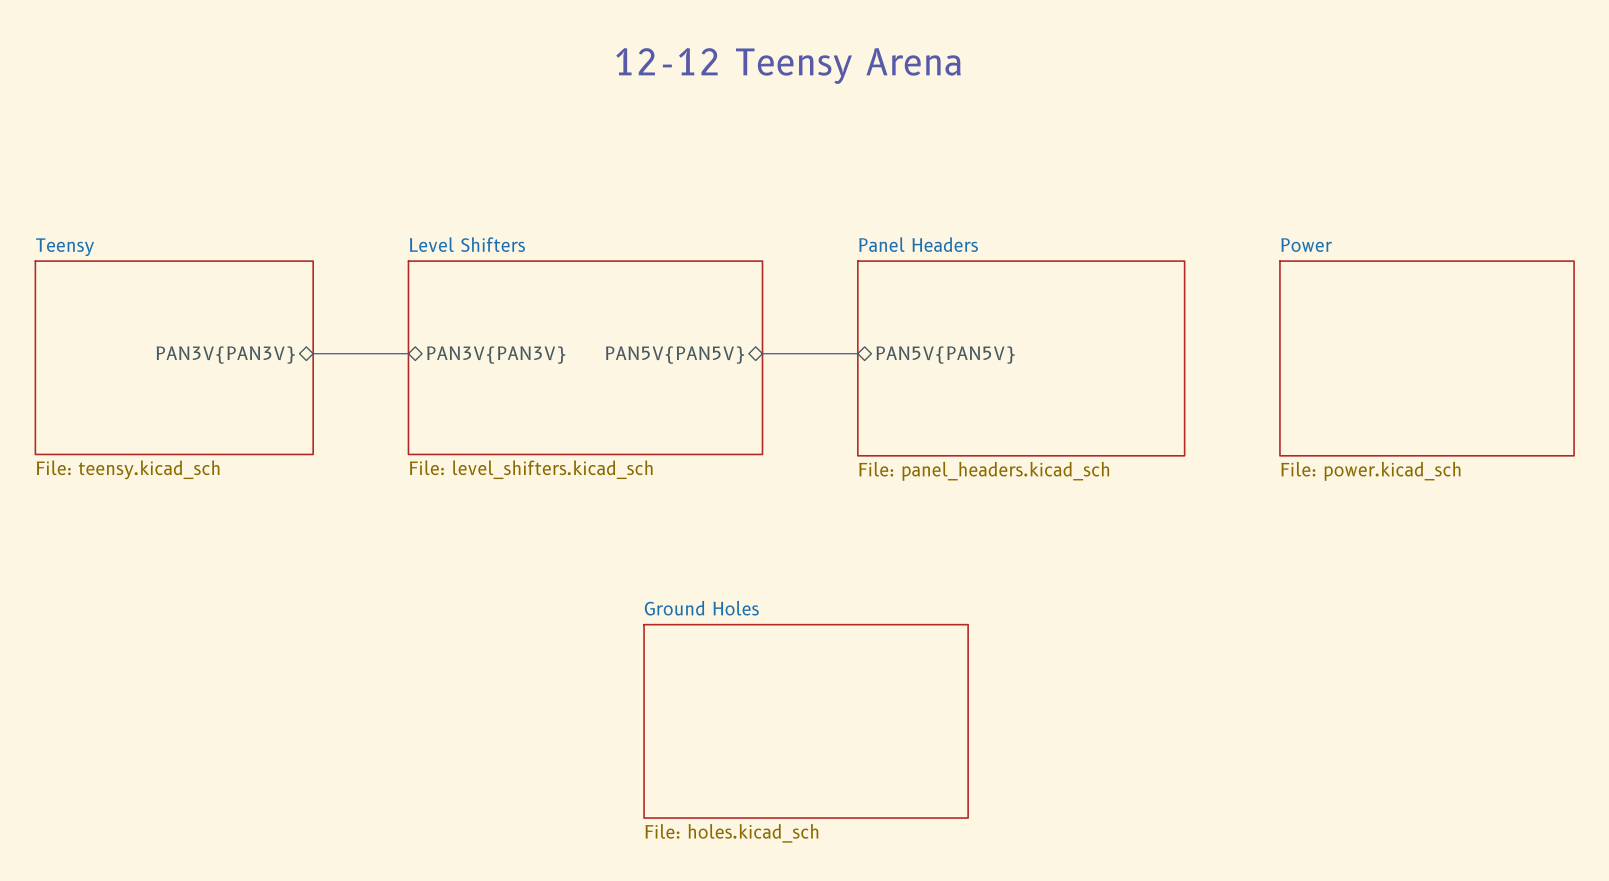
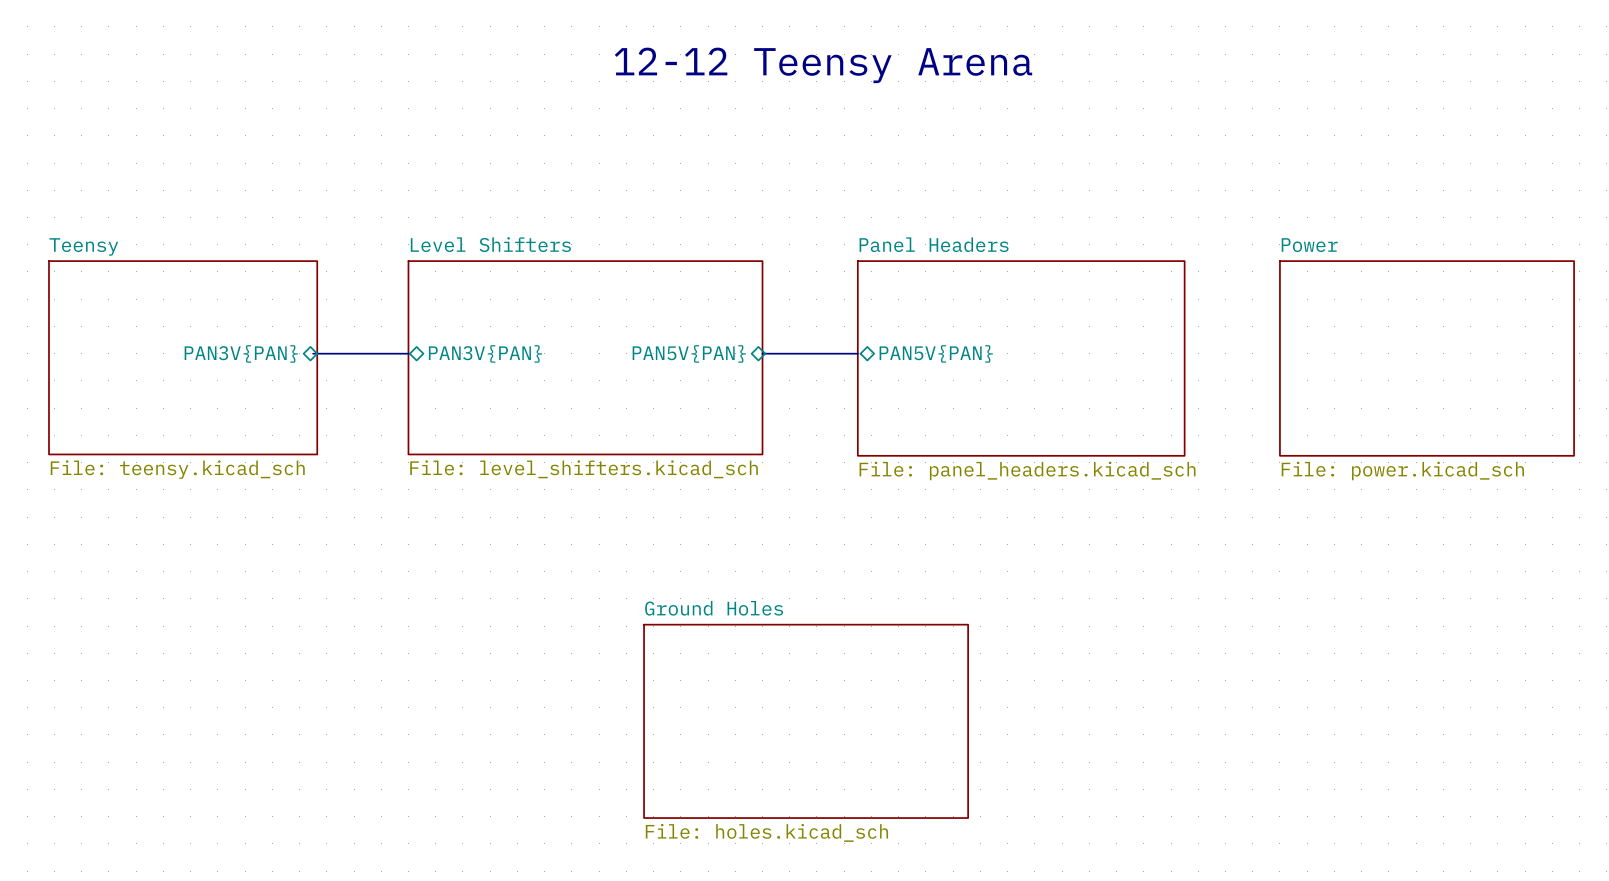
sheet Teensy shape: [34, 260, 314, 456] -> [48, 260, 319, 456]
sheet pin: PAN3V{PAN3V} (225, 355) -> PAN3V{PAN} (241, 353)
sheet pin: PAN3V{PAN3V} (496, 355) -> PAN3V{PAN} (485, 353)
sheet pin: PAN5V{PAN5V} (675, 355) -> PAN5V{PAN} (689, 353)
sheet pin: PAN5V{PAN5V} (945, 355) -> PAN5V{PAN} (936, 353)

